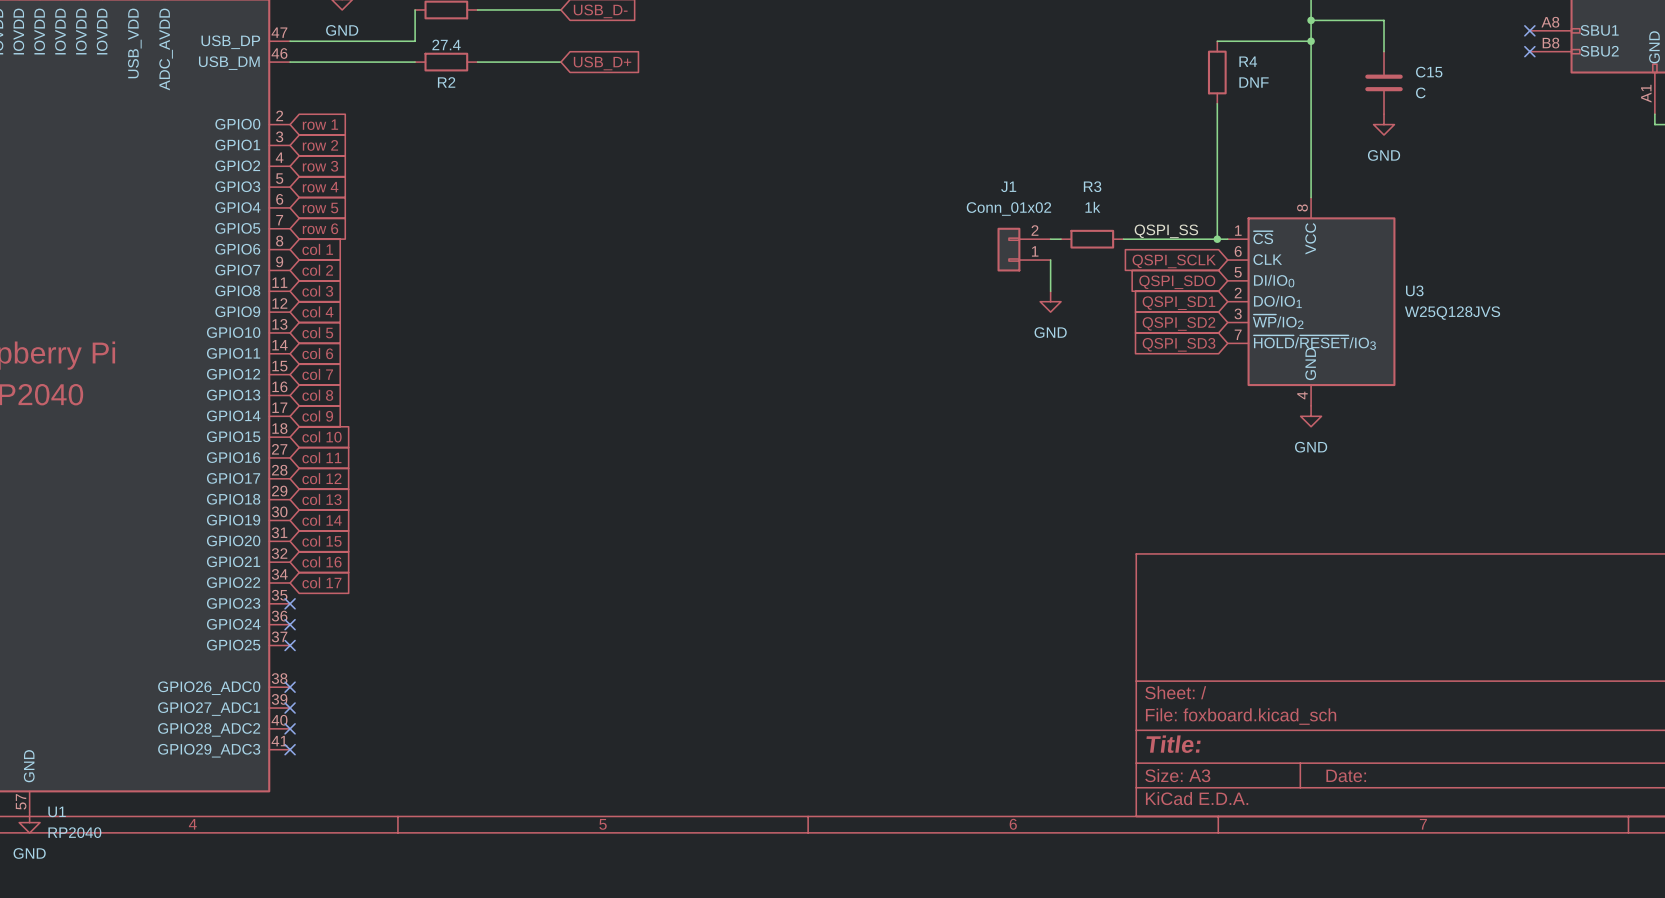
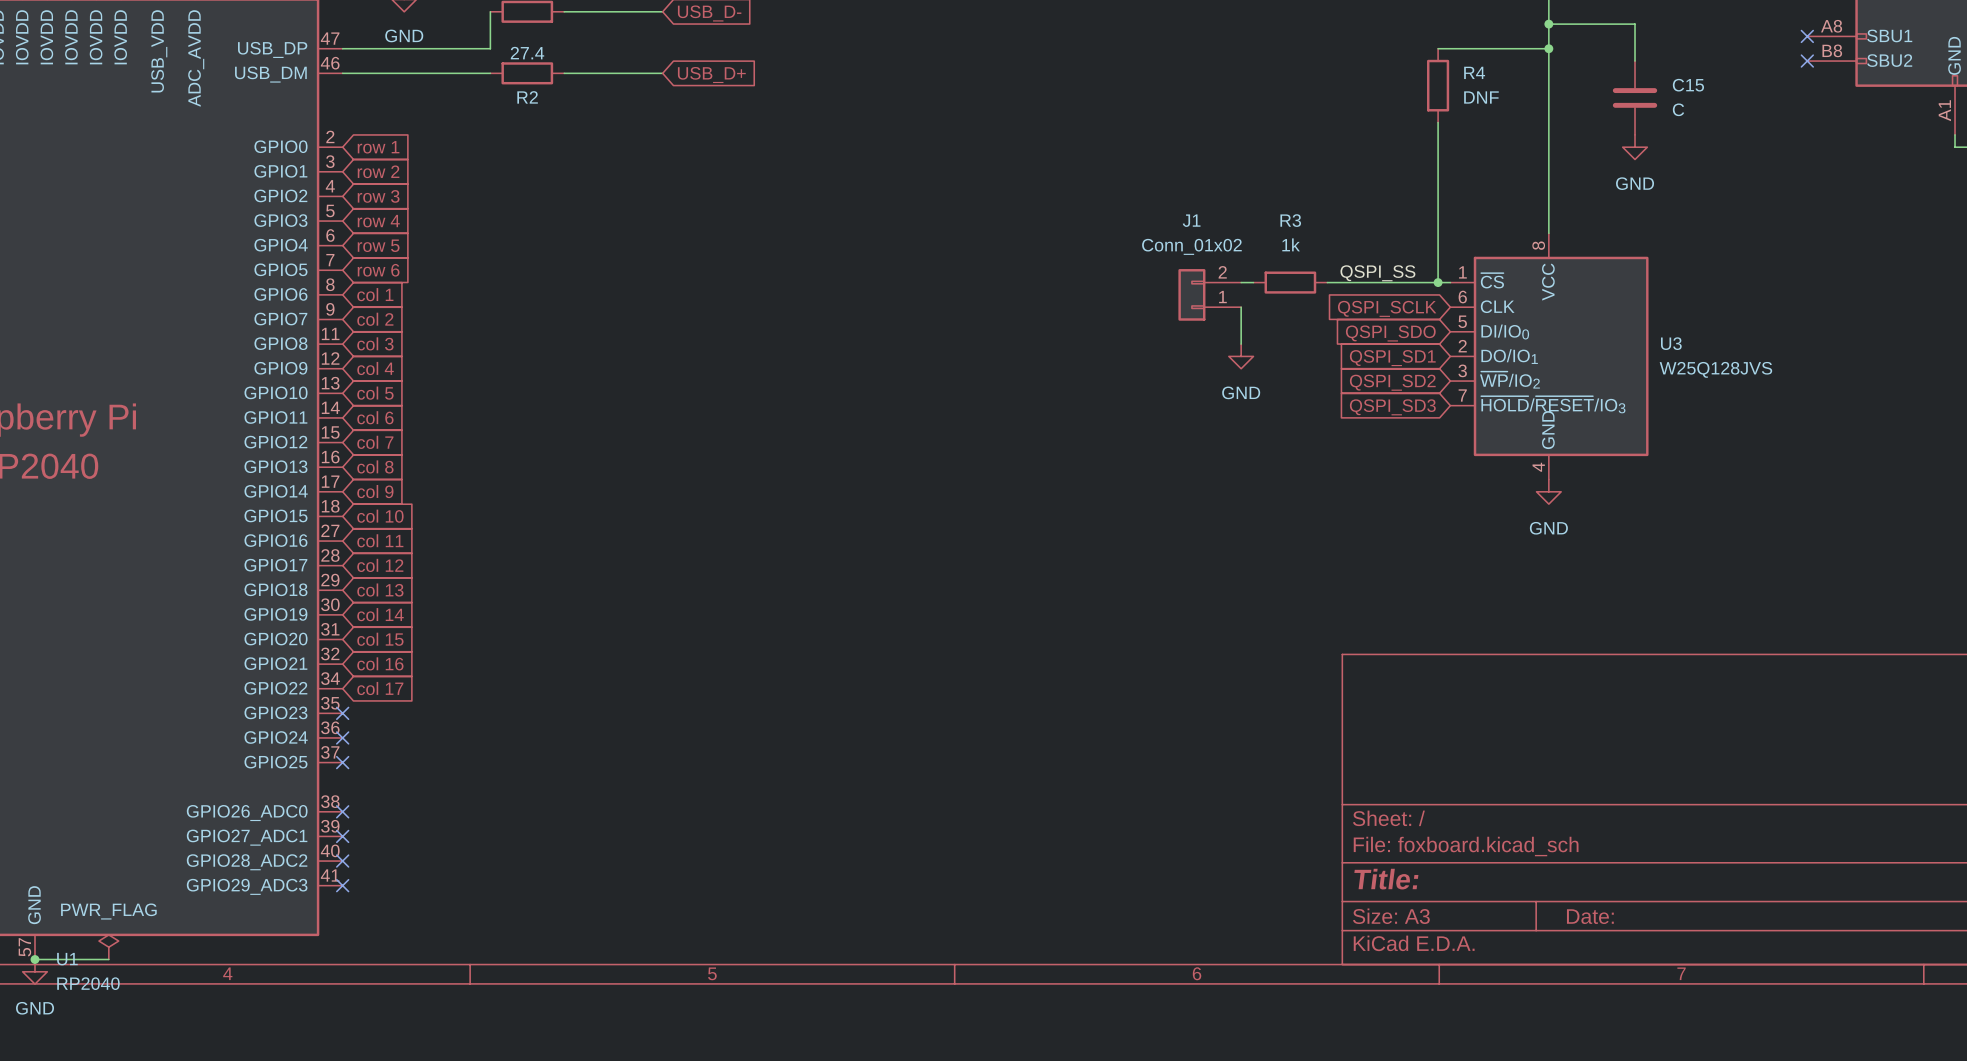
power symbol: none -> PWR_FLAG (108, 947)
wire: none -> (34, 959) (108, 959)
junction: none -> (34, 959)

